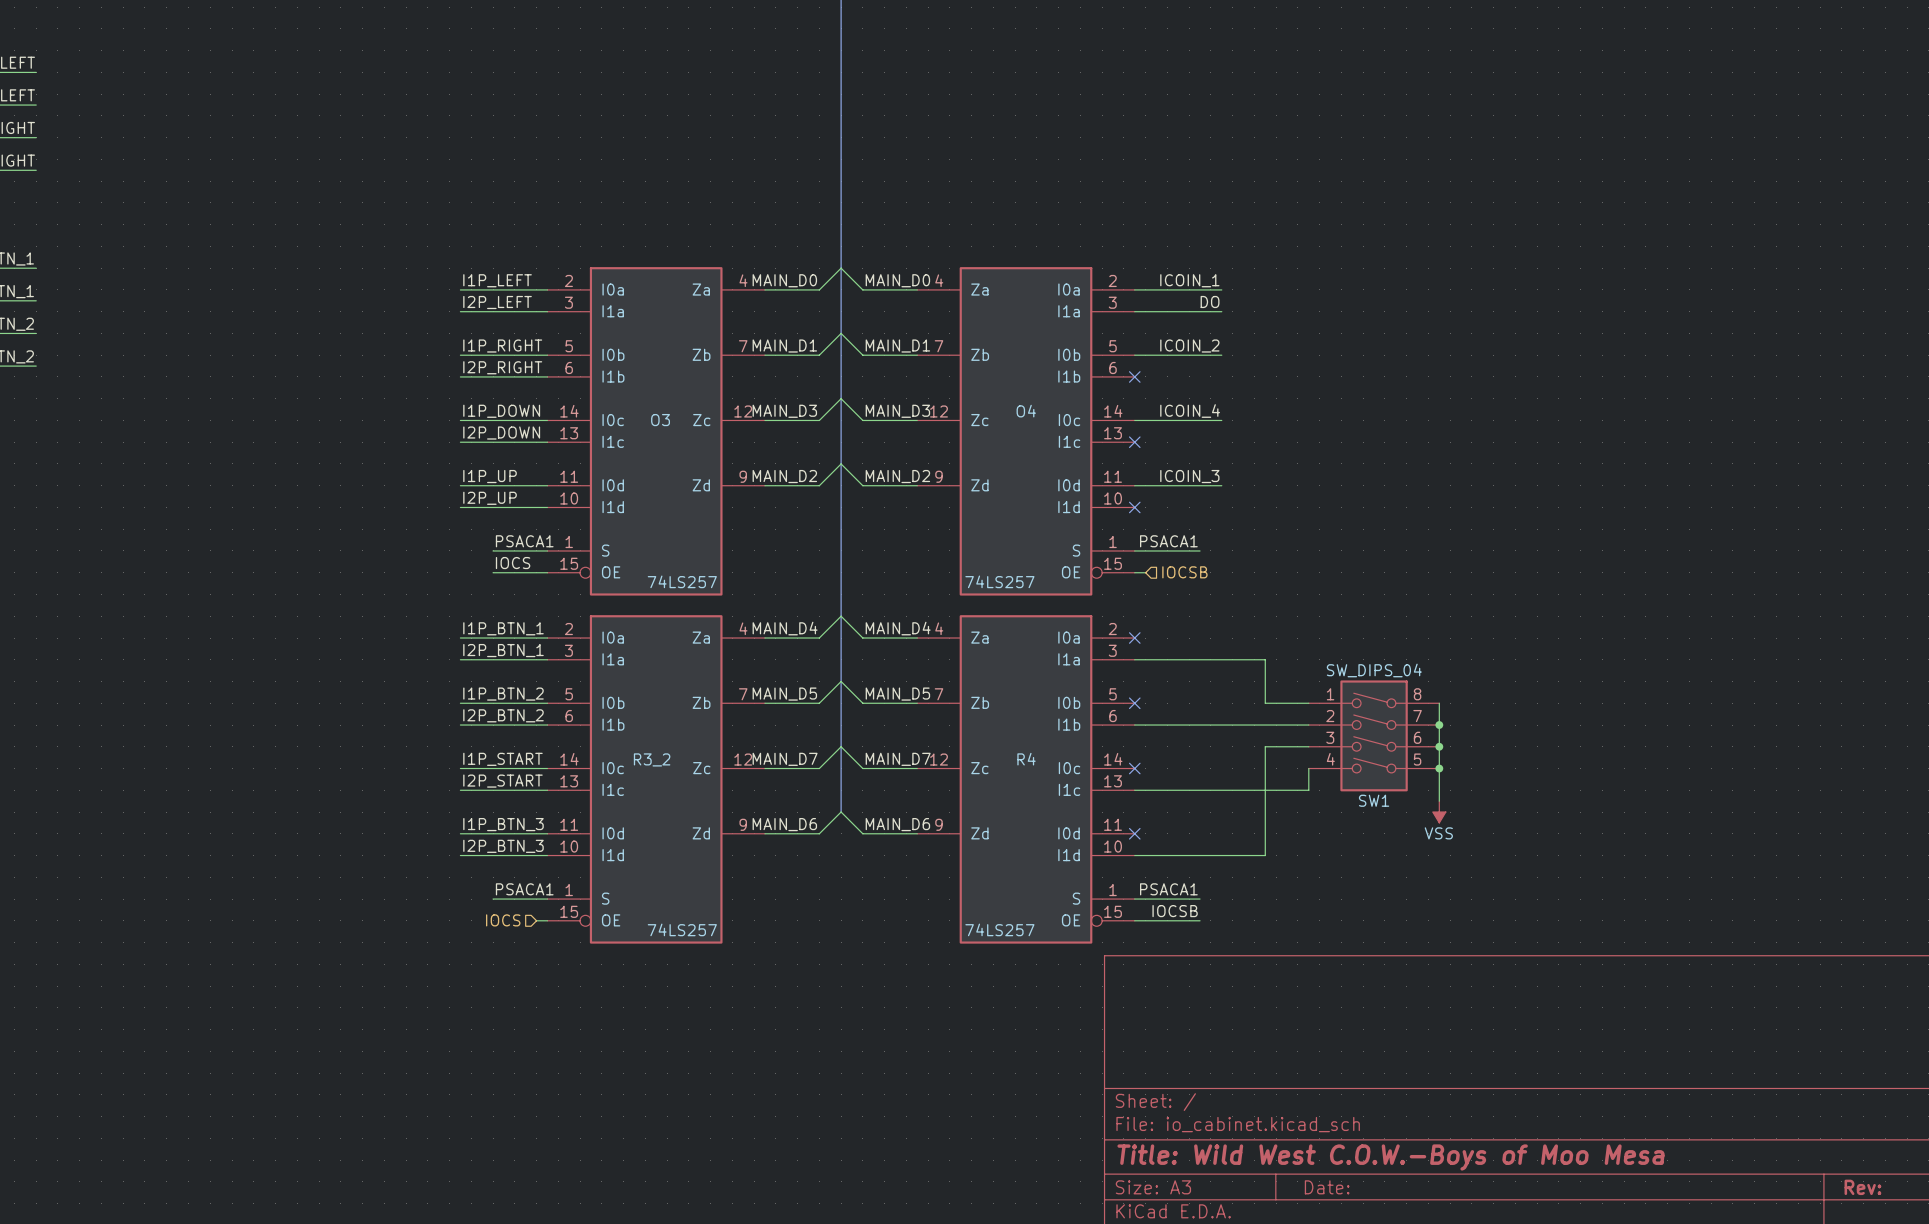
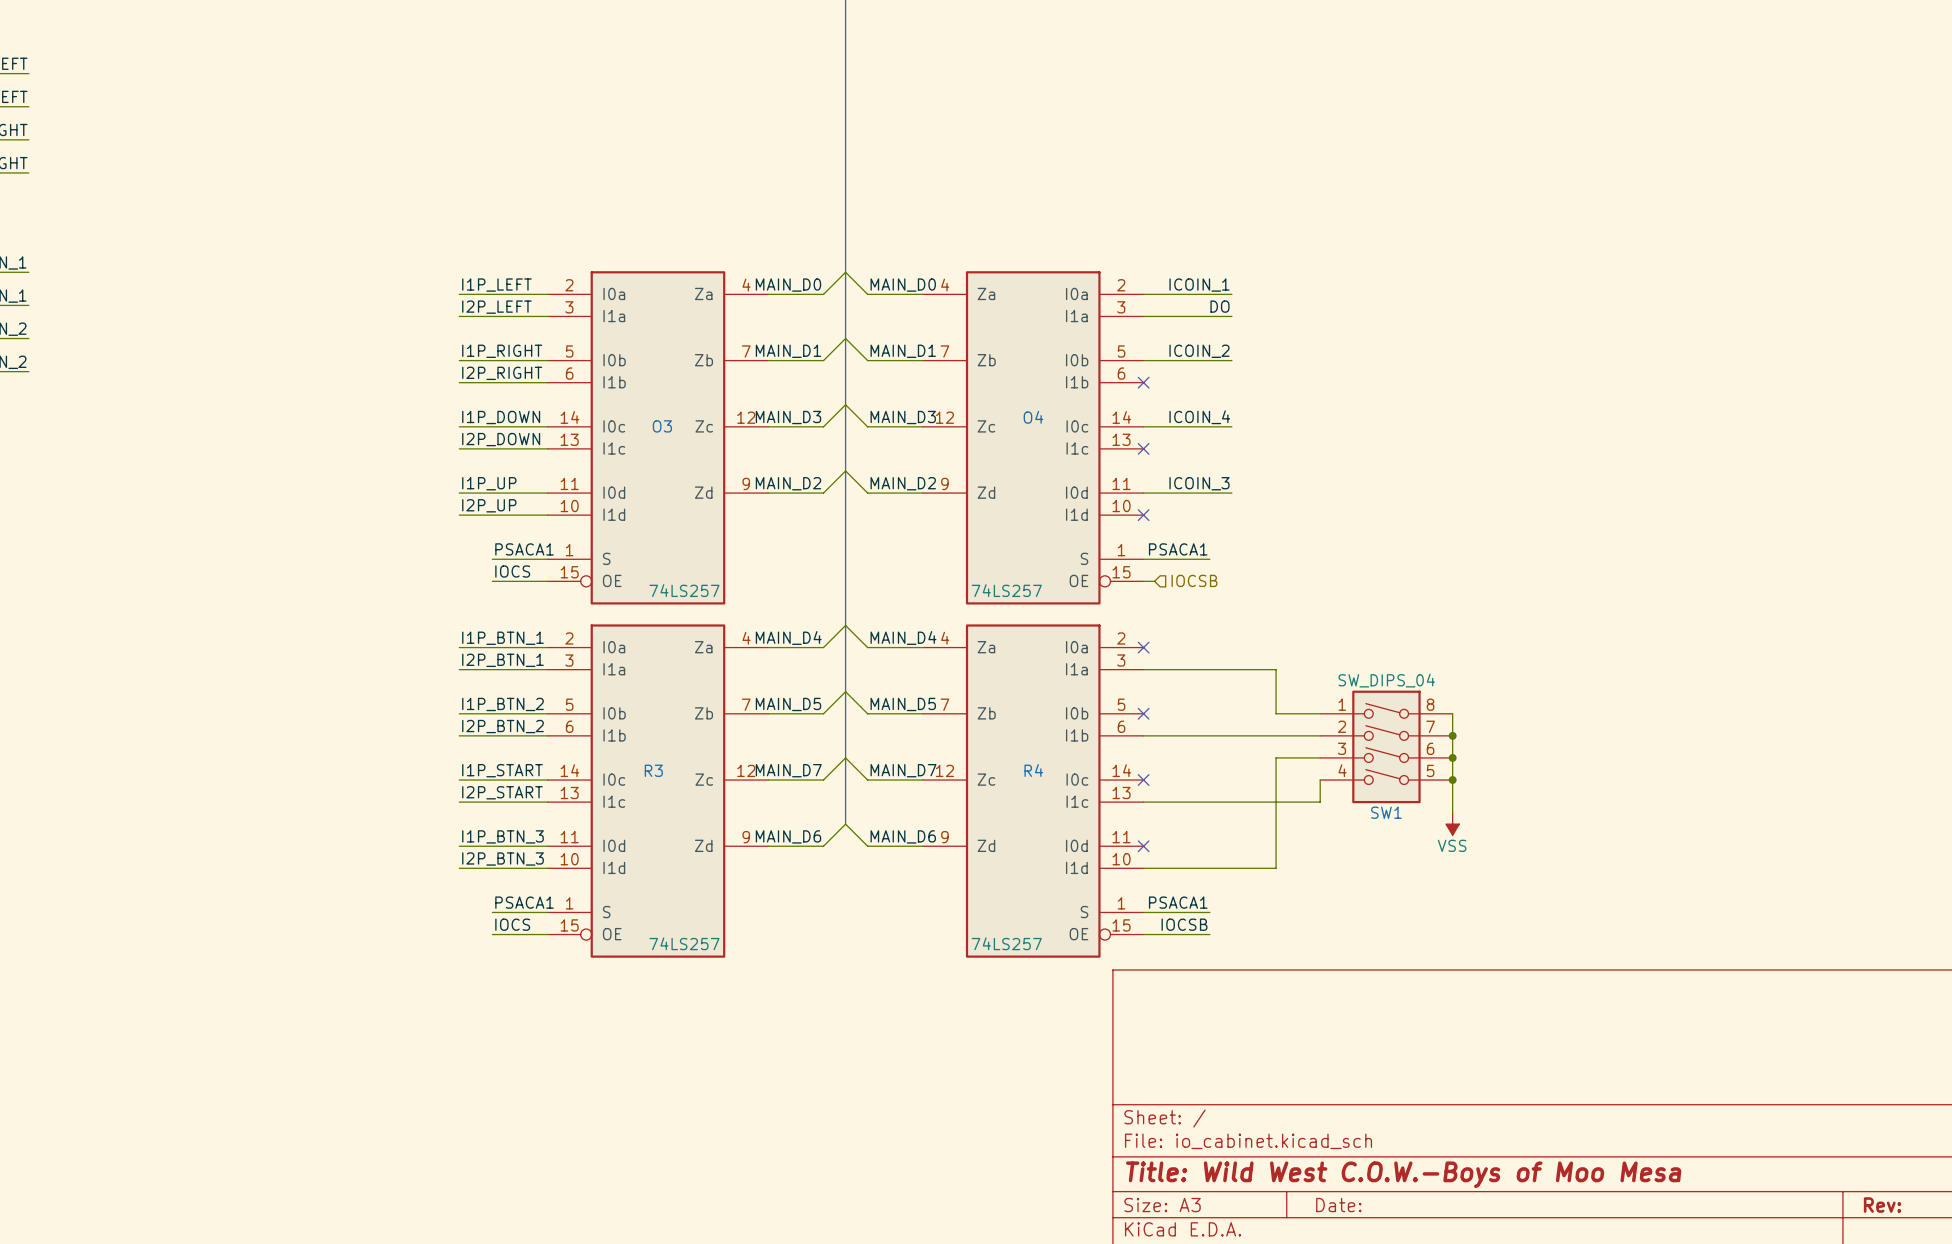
R3_2 name: R3_2 (652, 759) -> R3 (653, 770)
label: none -> IOCS (512, 924)
wire: none -> (492, 934) (536, 934)
hierarchical label: IOCS (503, 920) -> none

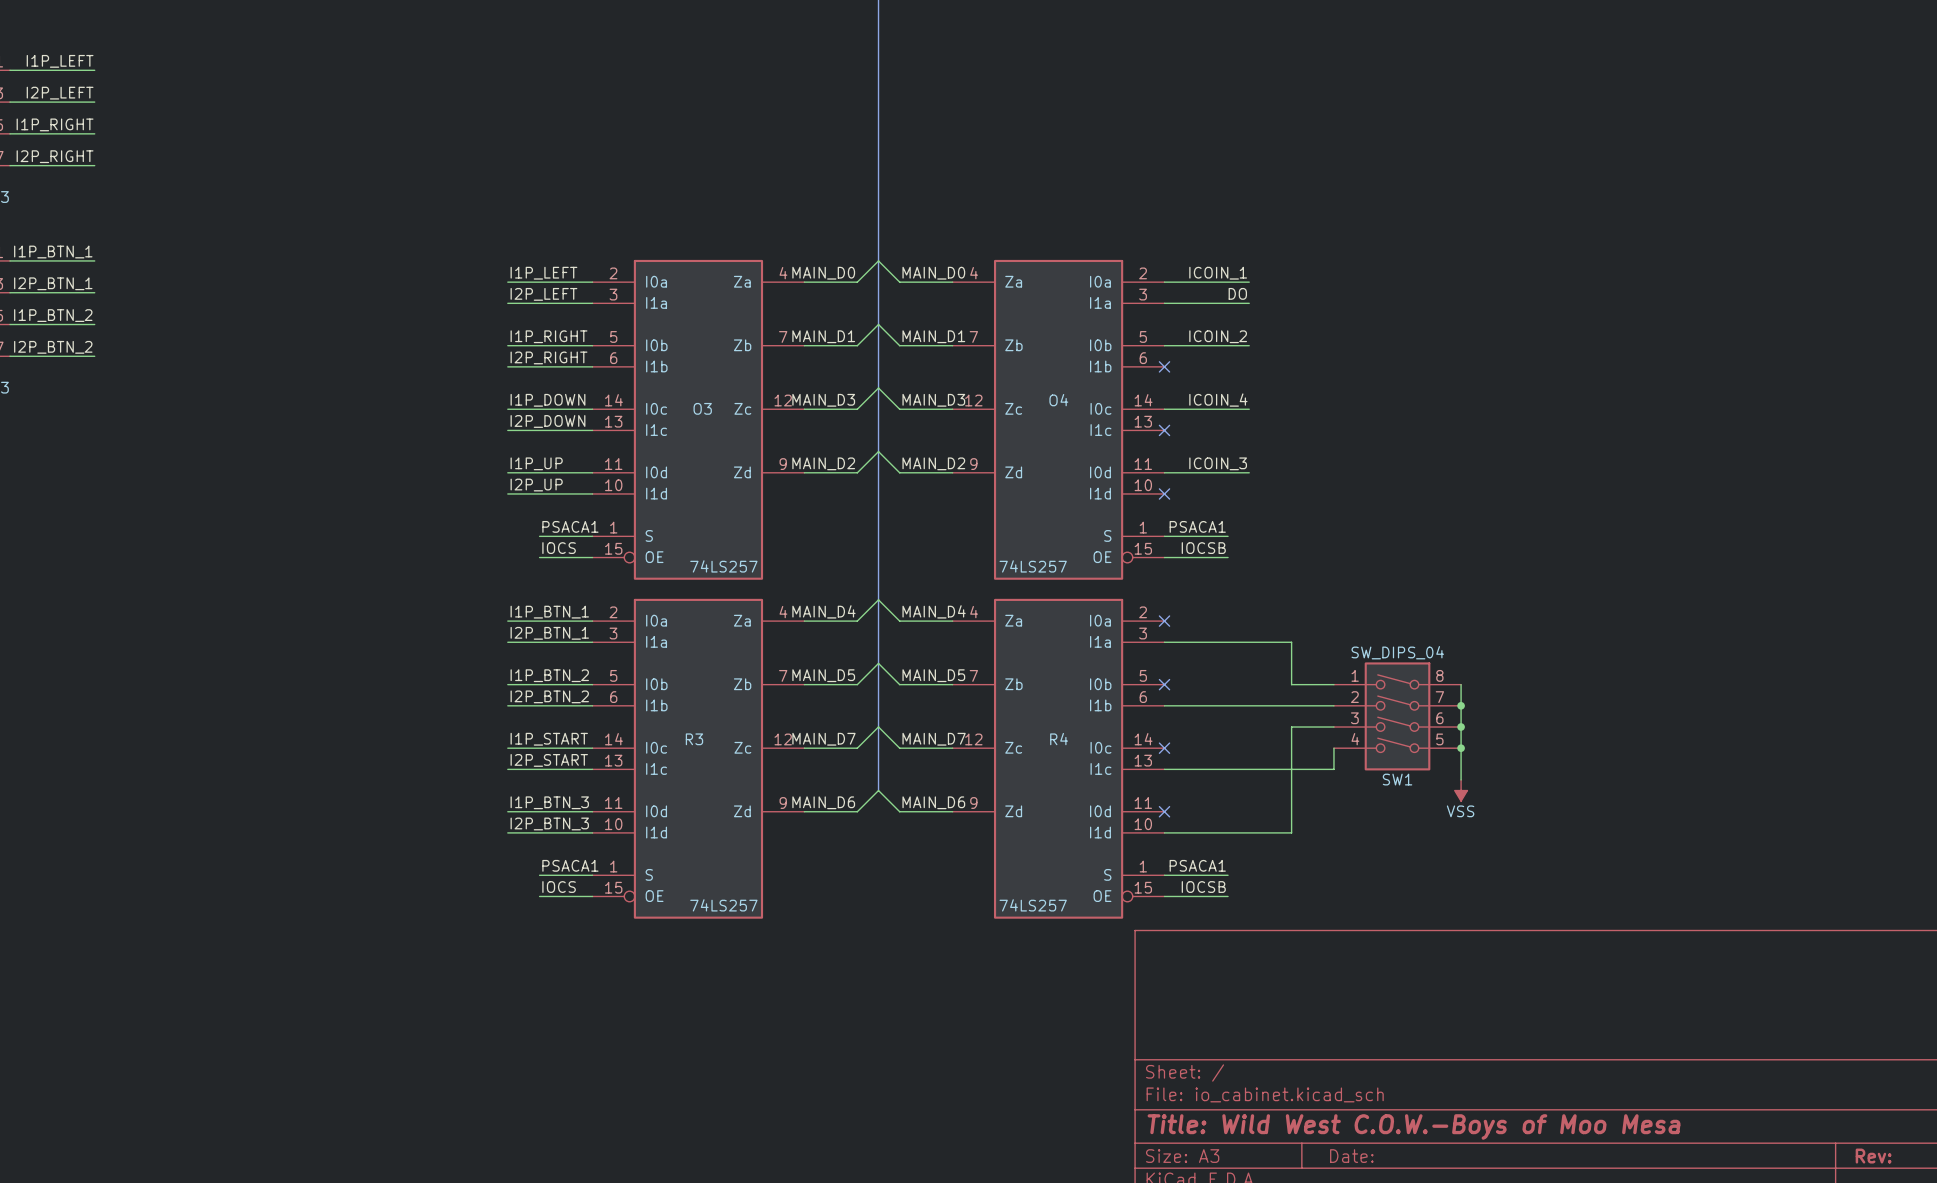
label: none -> IOCSB (1203, 548)
hierarchical label: IOCSB (1194, 580) -> none
wire: none -> (1175, 557) (1228, 557)

